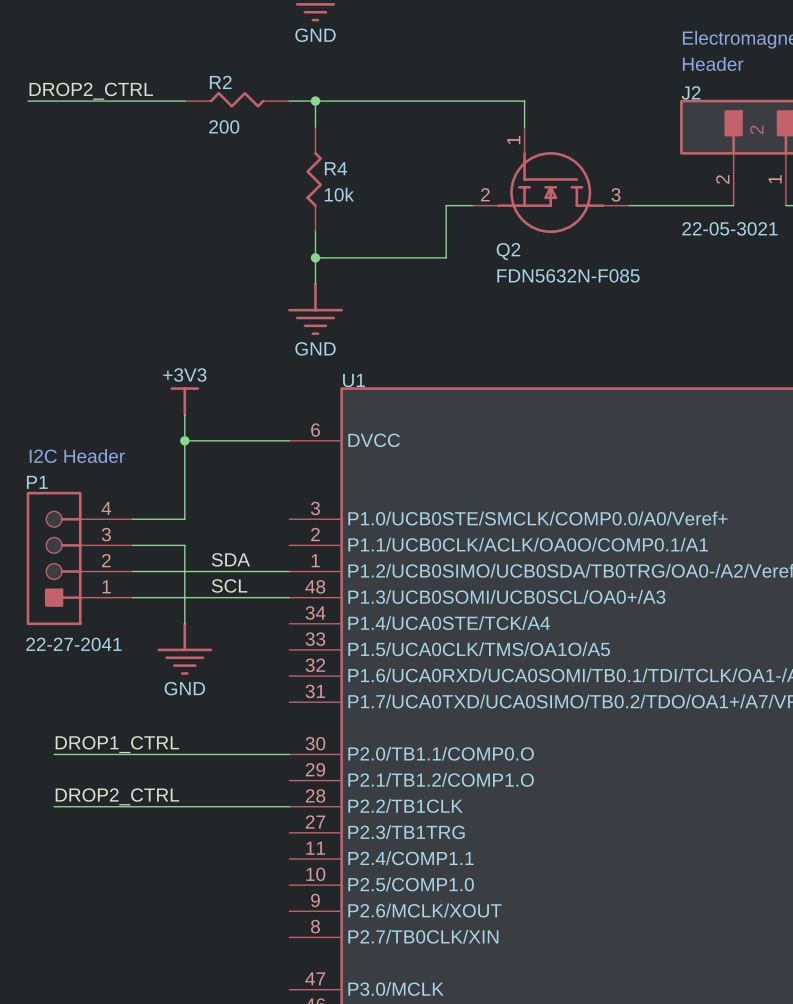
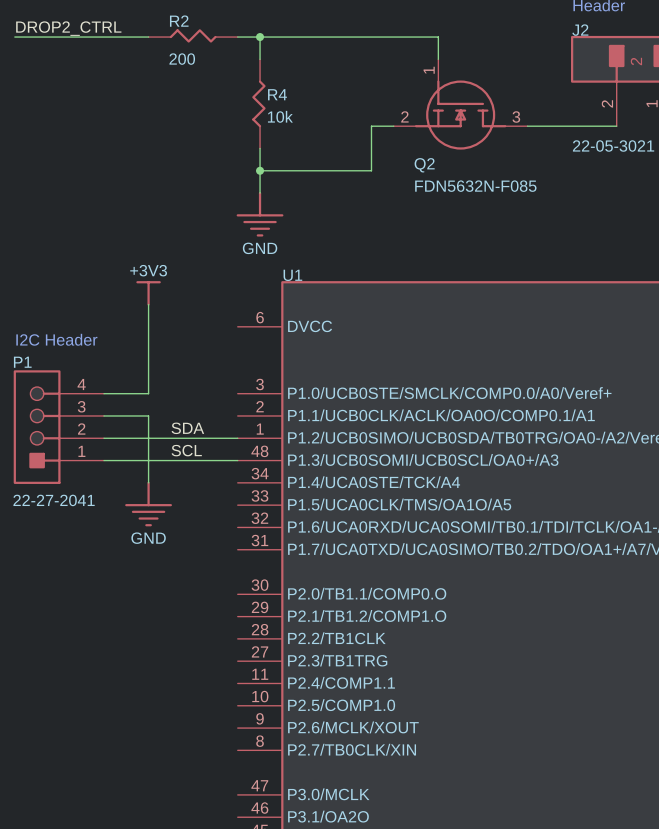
wire: (184, 440) (289, 440) -> none
junction: (184, 440) -> none
label: DROP1_CTRL (117, 744) -> none
wire: (54, 754) (289, 754) -> none
label: DROP2_CTRL (117, 796) -> none
wire: (54, 806) (289, 806) -> none

